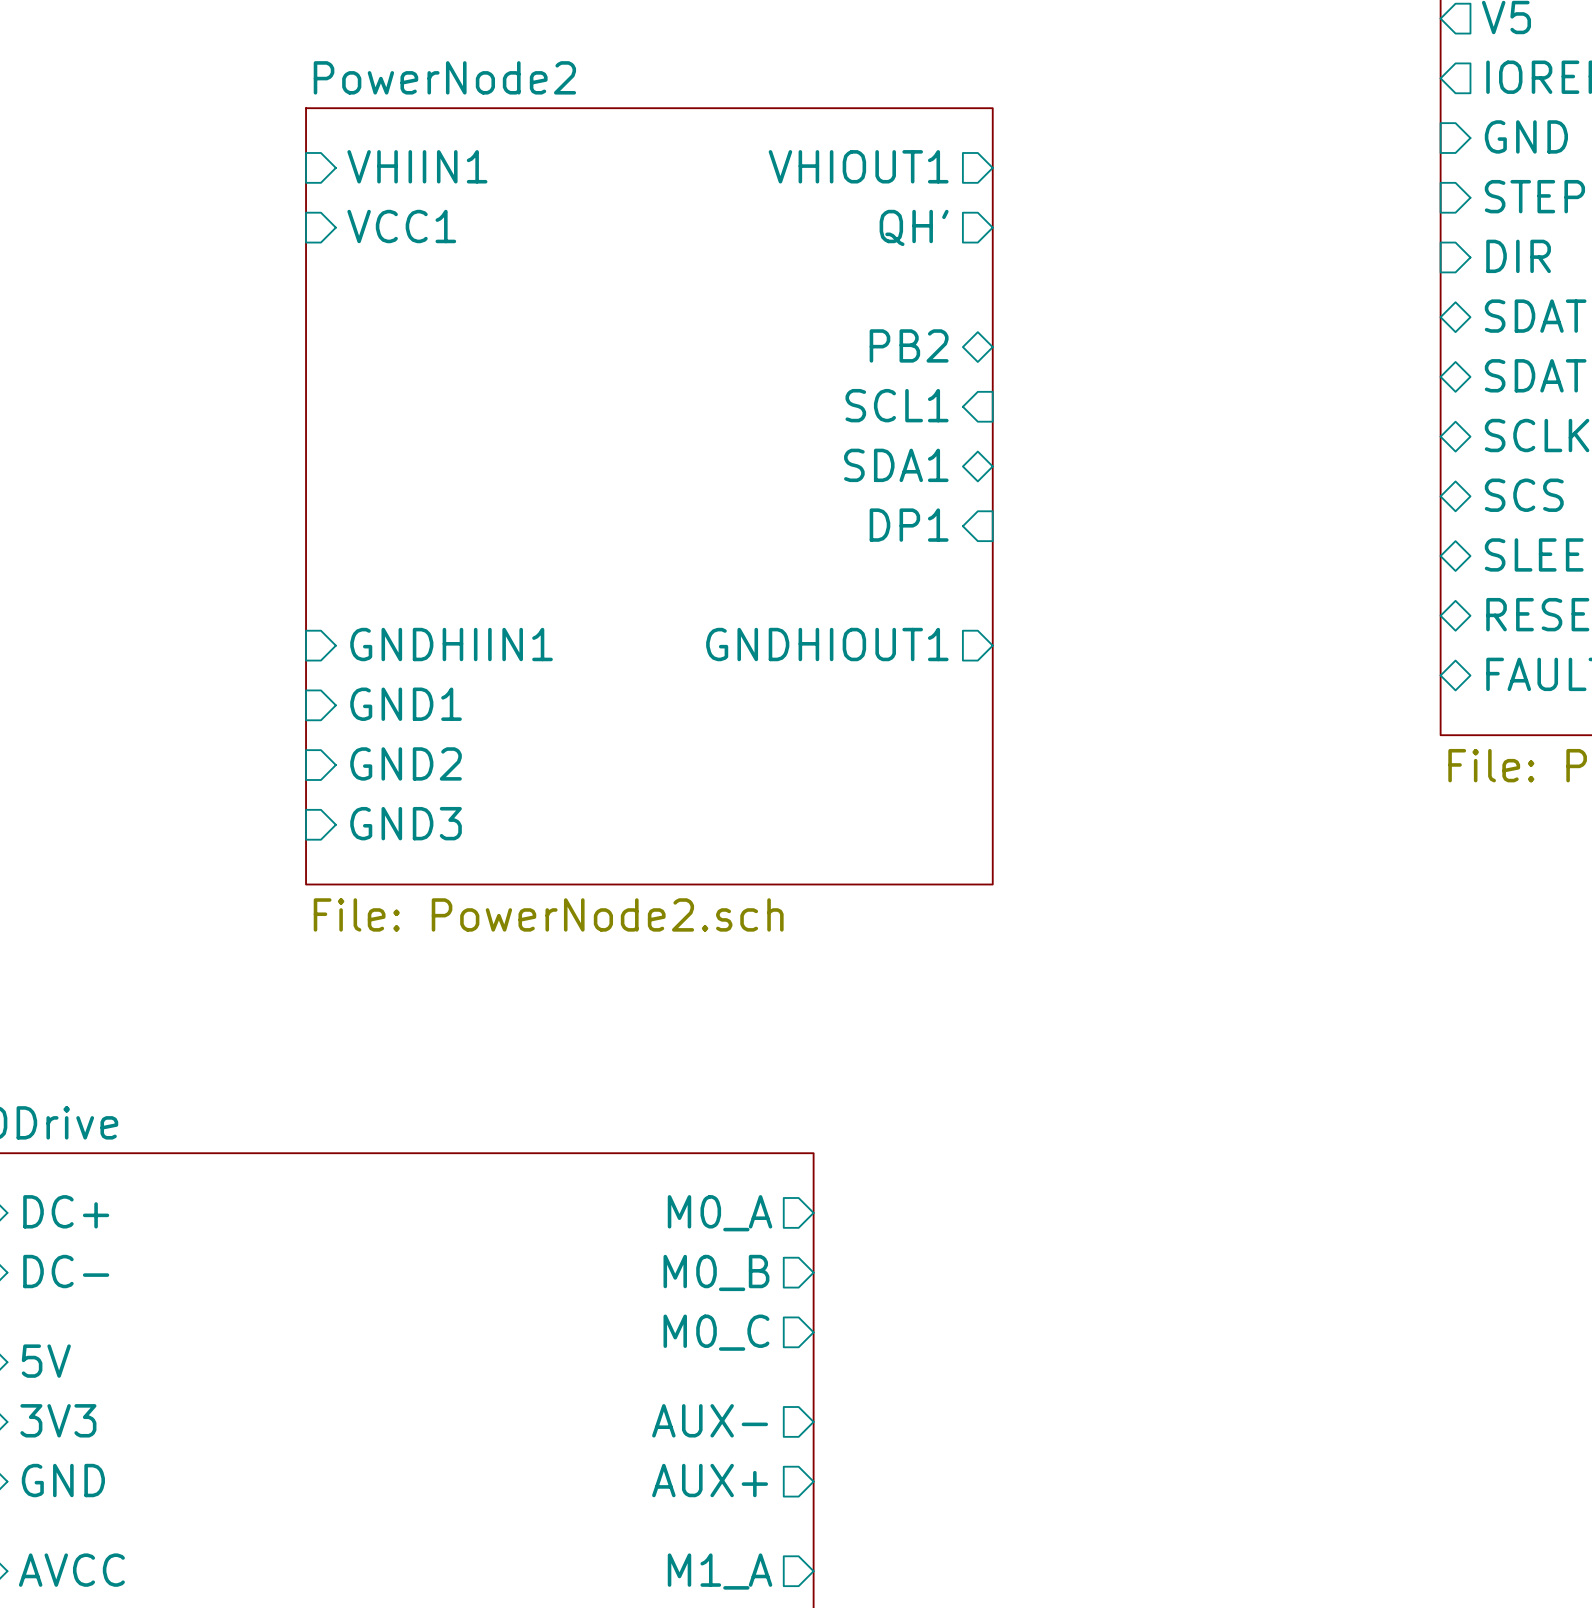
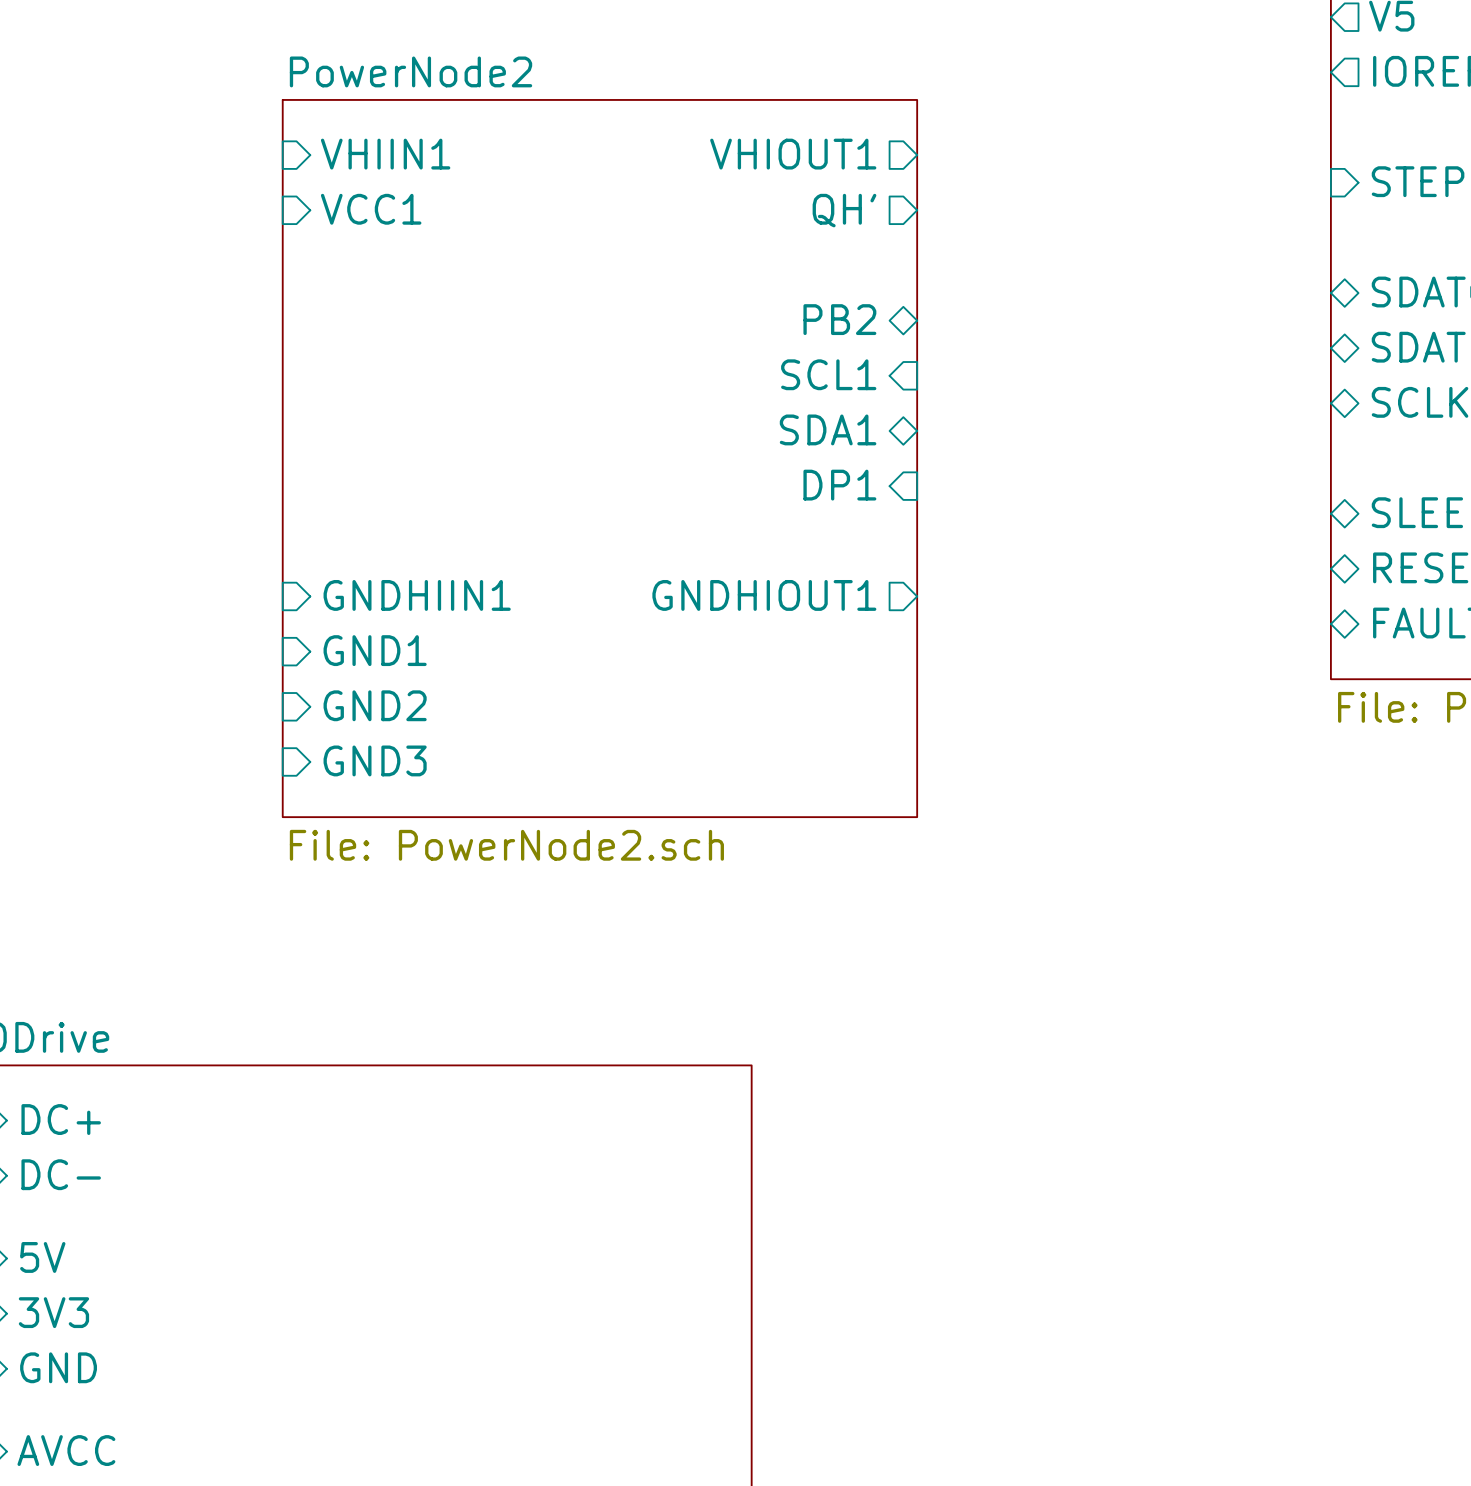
sheet pin: GND (1526, 136) -> none
sheet pin: DIR (1518, 256) -> none
sheet pin: SCS (1524, 495) -> none
sheet pin: M0_A (720, 1213) -> none
sheet pin: M0_B (716, 1272) -> none
sheet pin: M0_C (716, 1332) -> none
sheet pin: AUX- (710, 1420) -> none
sheet pin: AUX+ (710, 1480) -> none
sheet pin: M1_A (720, 1571) -> none

